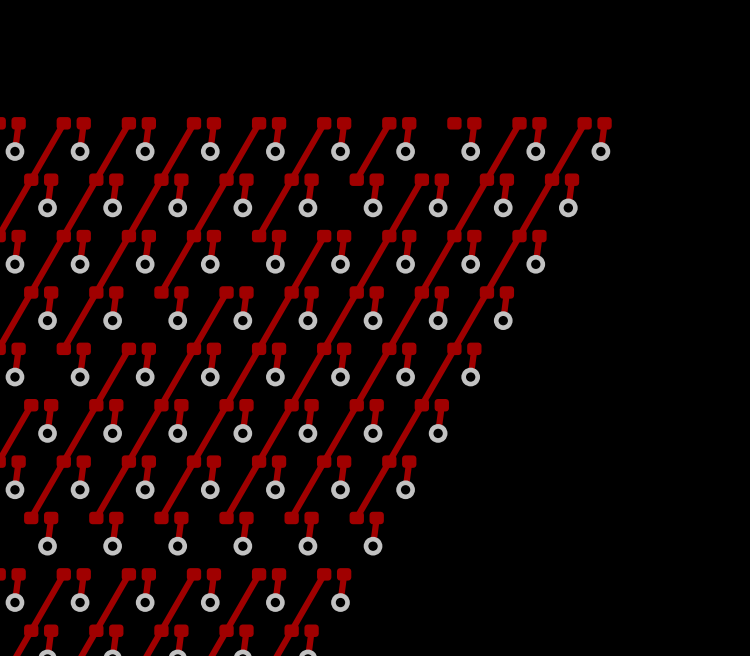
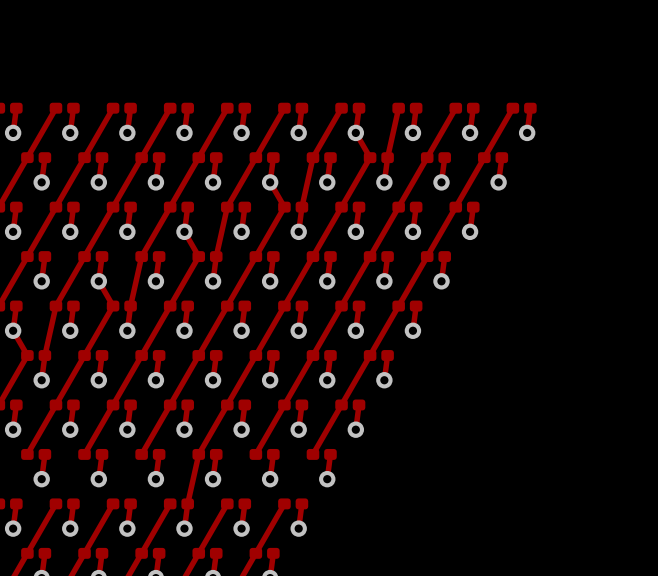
track: none -> (398, 108) (387, 157)
track: none -> (355, 132) (370, 157)
track: none -> (312, 157) (301, 207)
track: none -> (270, 182) (284, 207)
track: none -> (227, 207) (216, 256)
track: none -> (184, 231) (198, 256)
track: none -> (141, 256) (130, 306)
track: none -> (98, 281) (113, 306)
track: none -> (55, 306) (44, 355)
track: none -> (13, 330) (27, 355)
track: none -> (198, 454) (187, 503)

